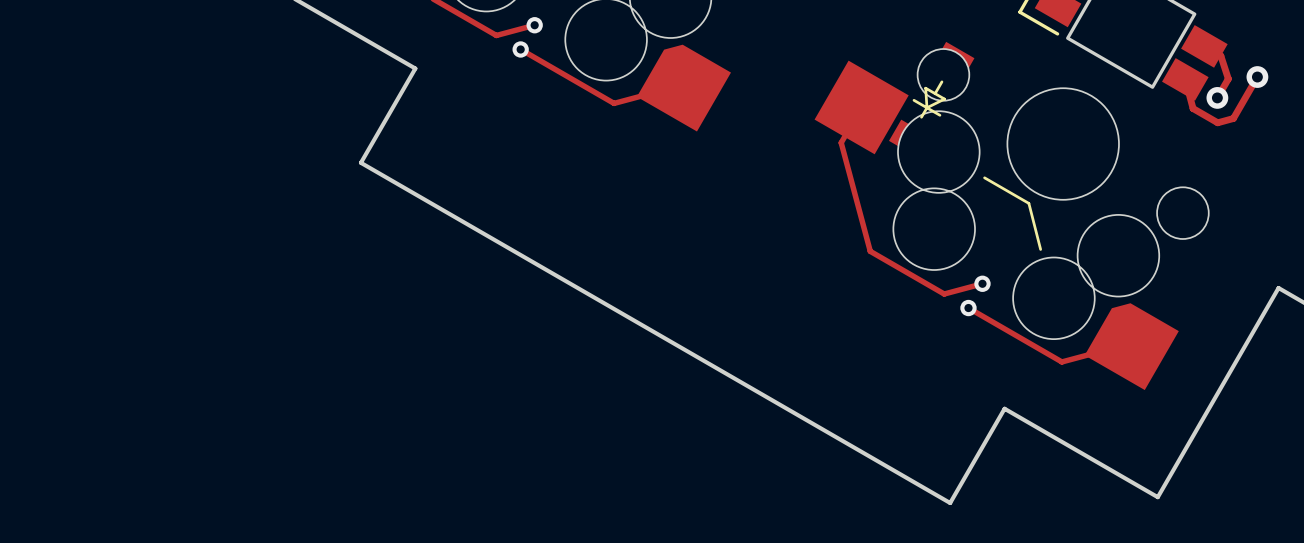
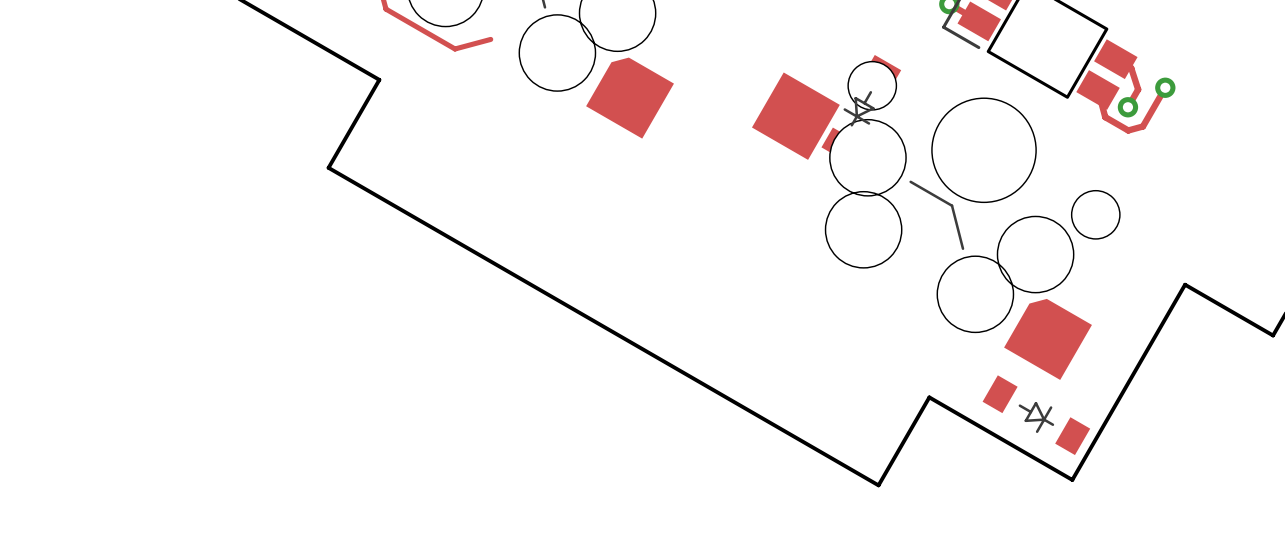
via: (534, 25) -> none
track: (520, 49) (614, 103) (683, 84) -> none
via: (520, 49) -> none
track: (861, 107) (841, 142) (870, 251) (944, 294) (982, 283) -> none
via: (982, 283) -> none
track: (968, 308) (1061, 361) (1131, 343) -> none
via: (968, 308) -> none
part: none -> (1036, 415)

